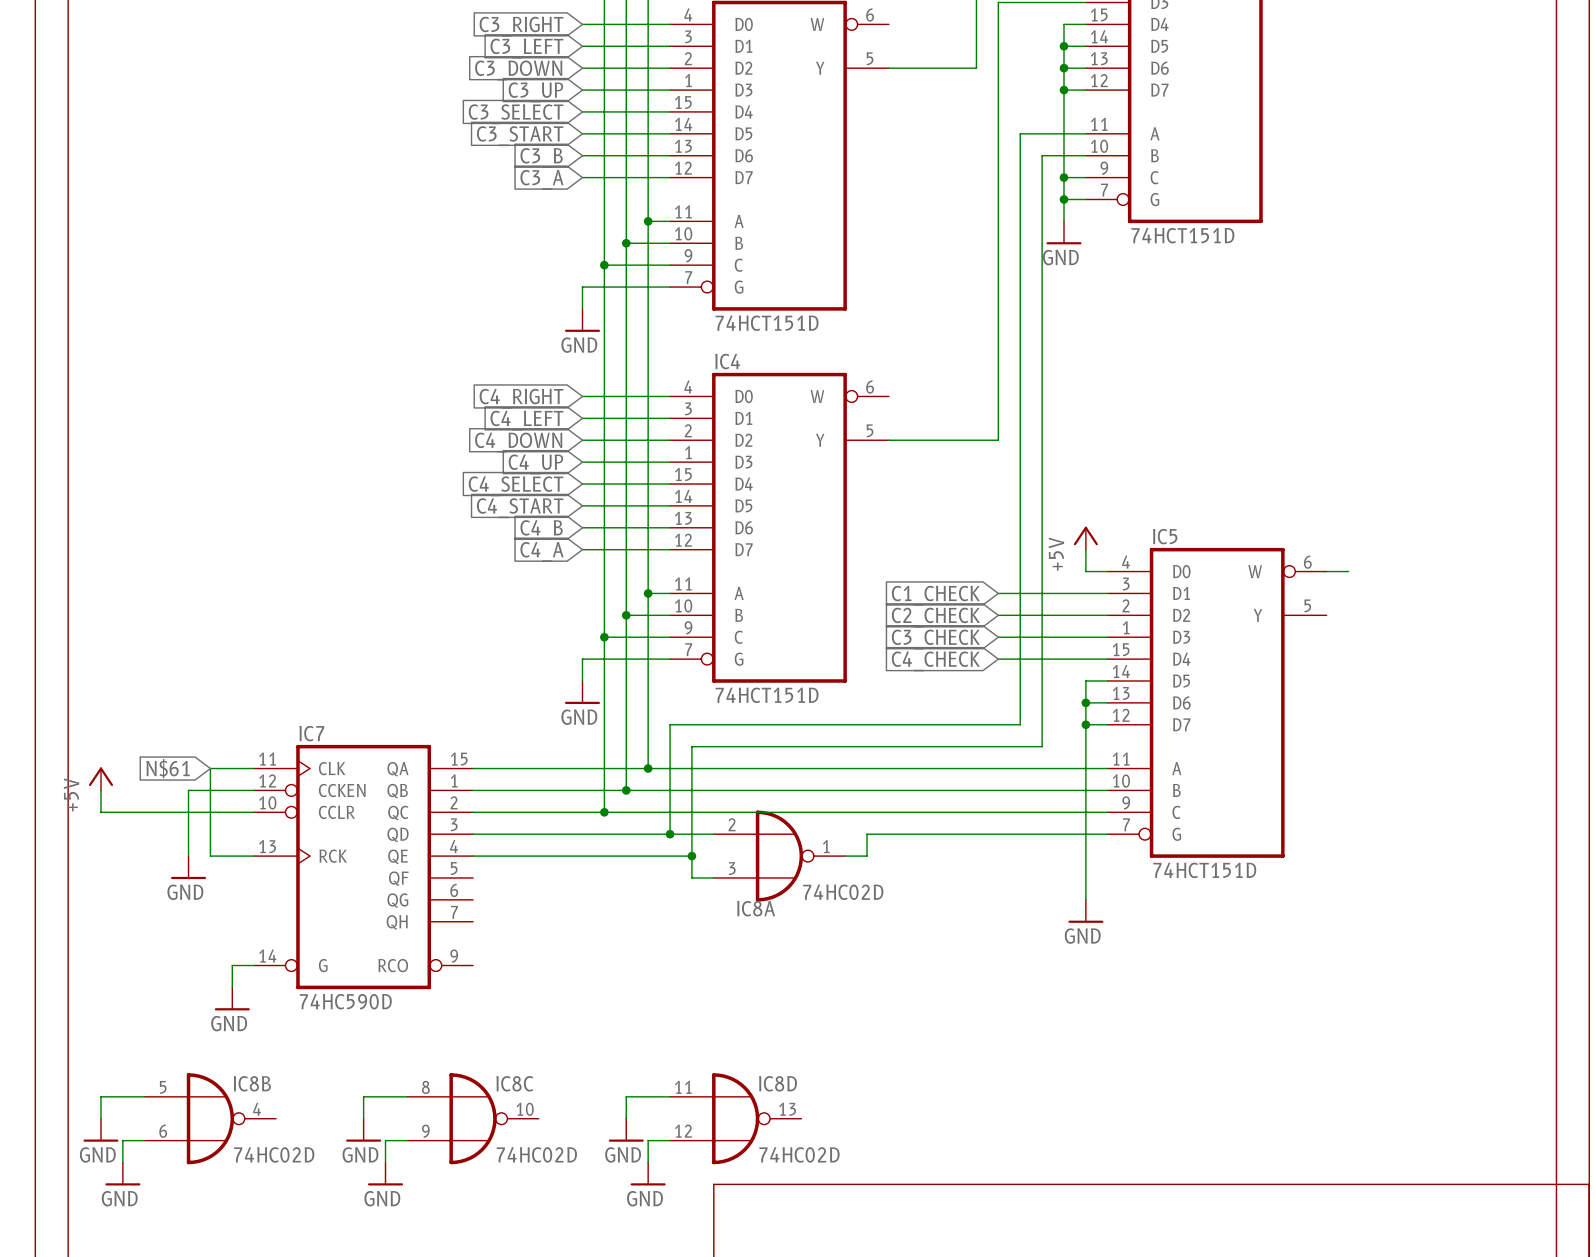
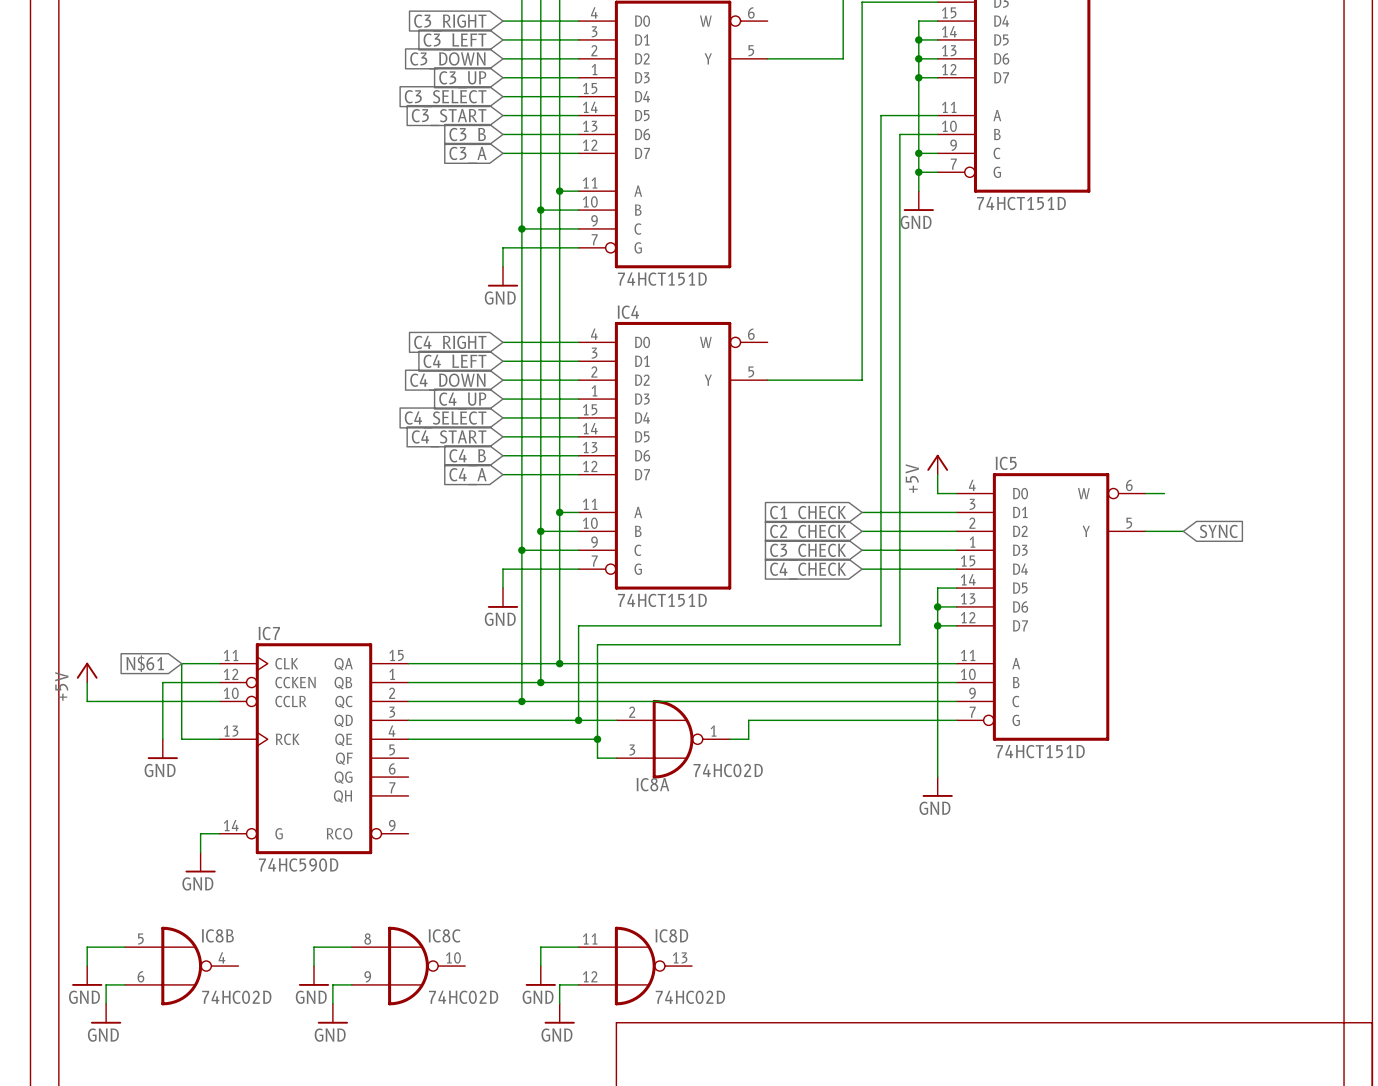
wire: none -> (1145, 531) (1183, 531)
global label: none -> SYNC (1218, 531)

